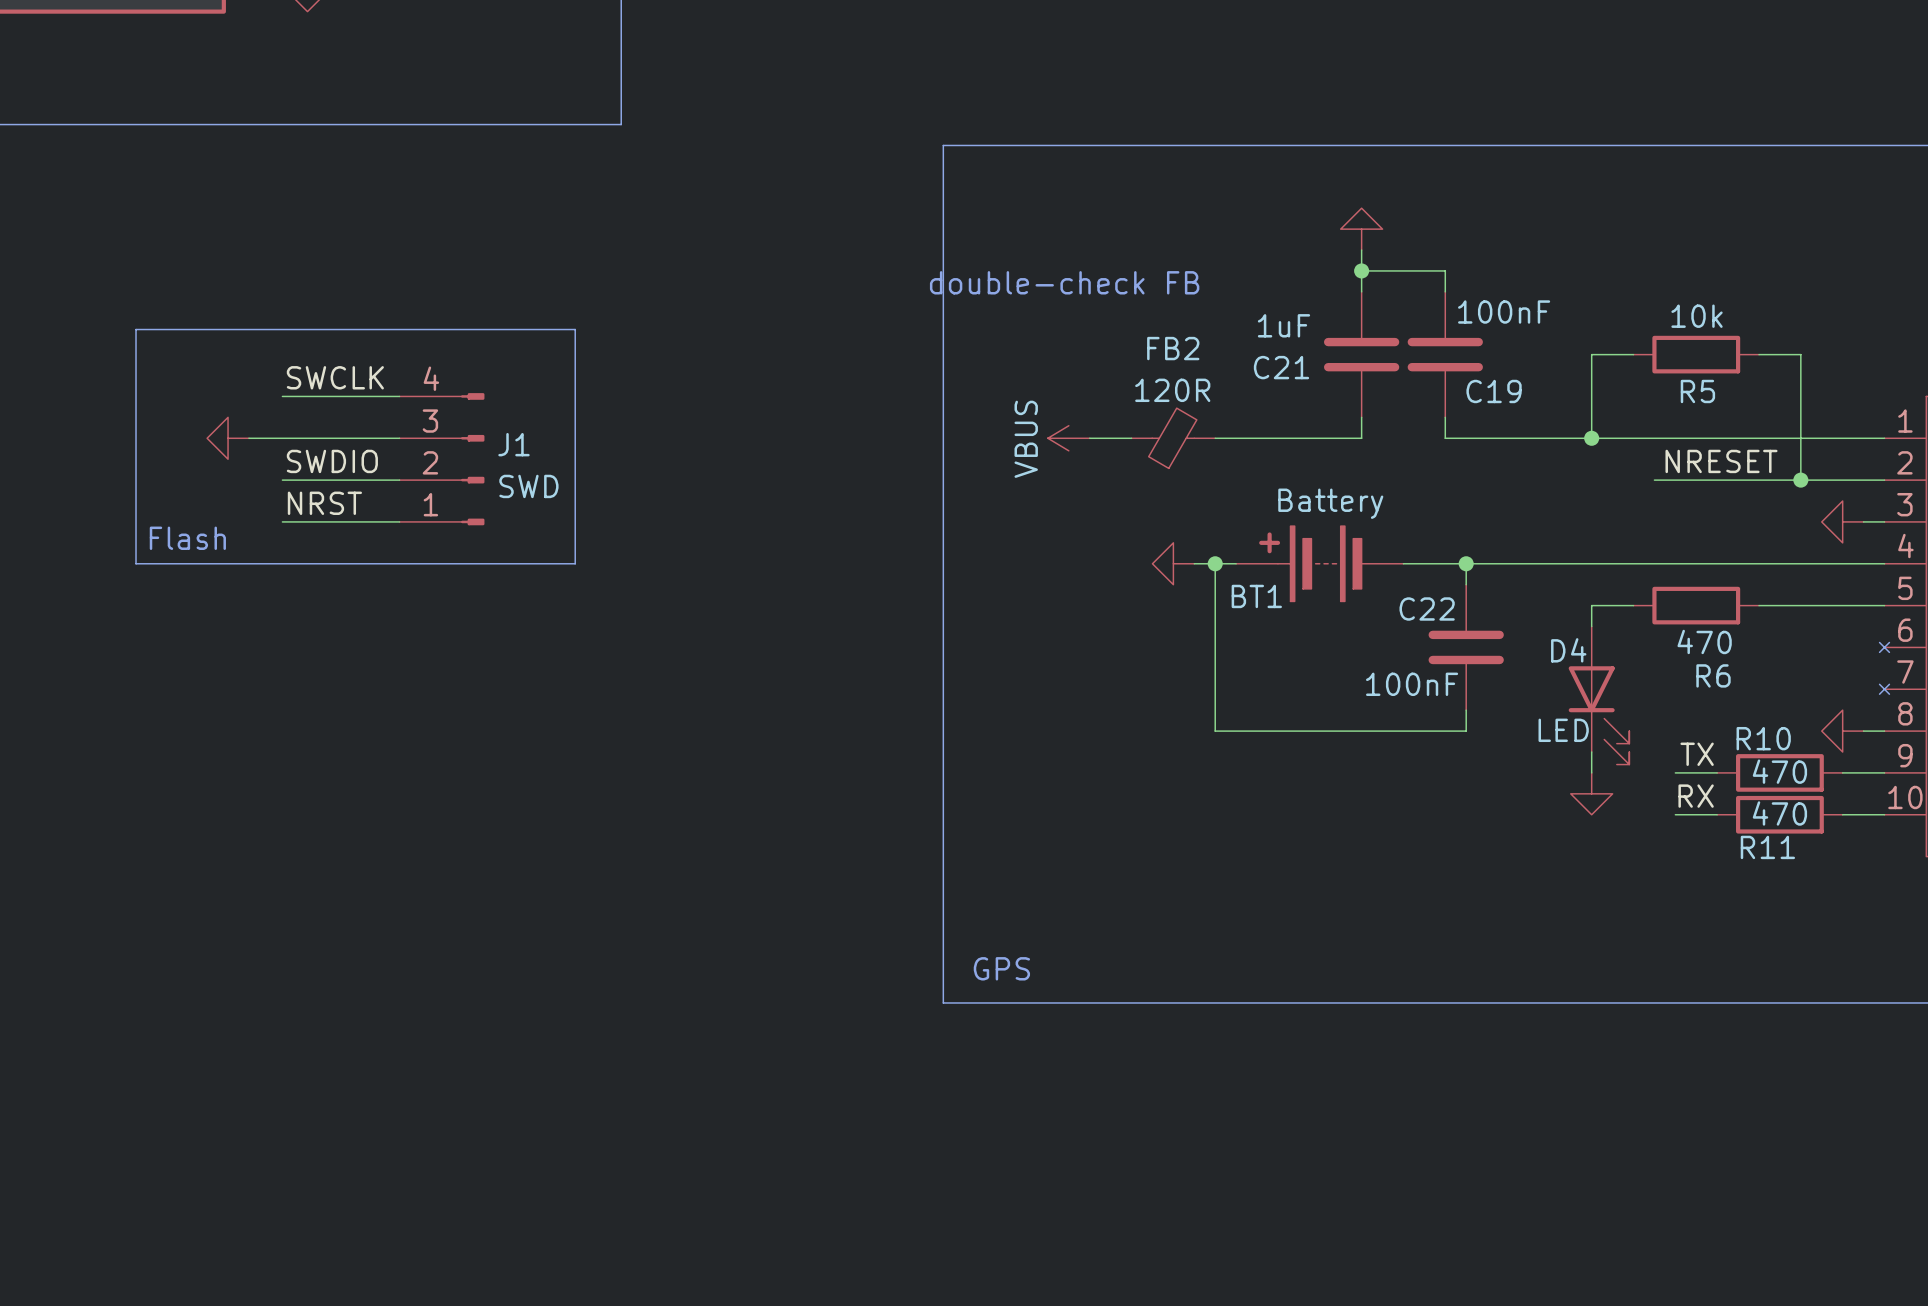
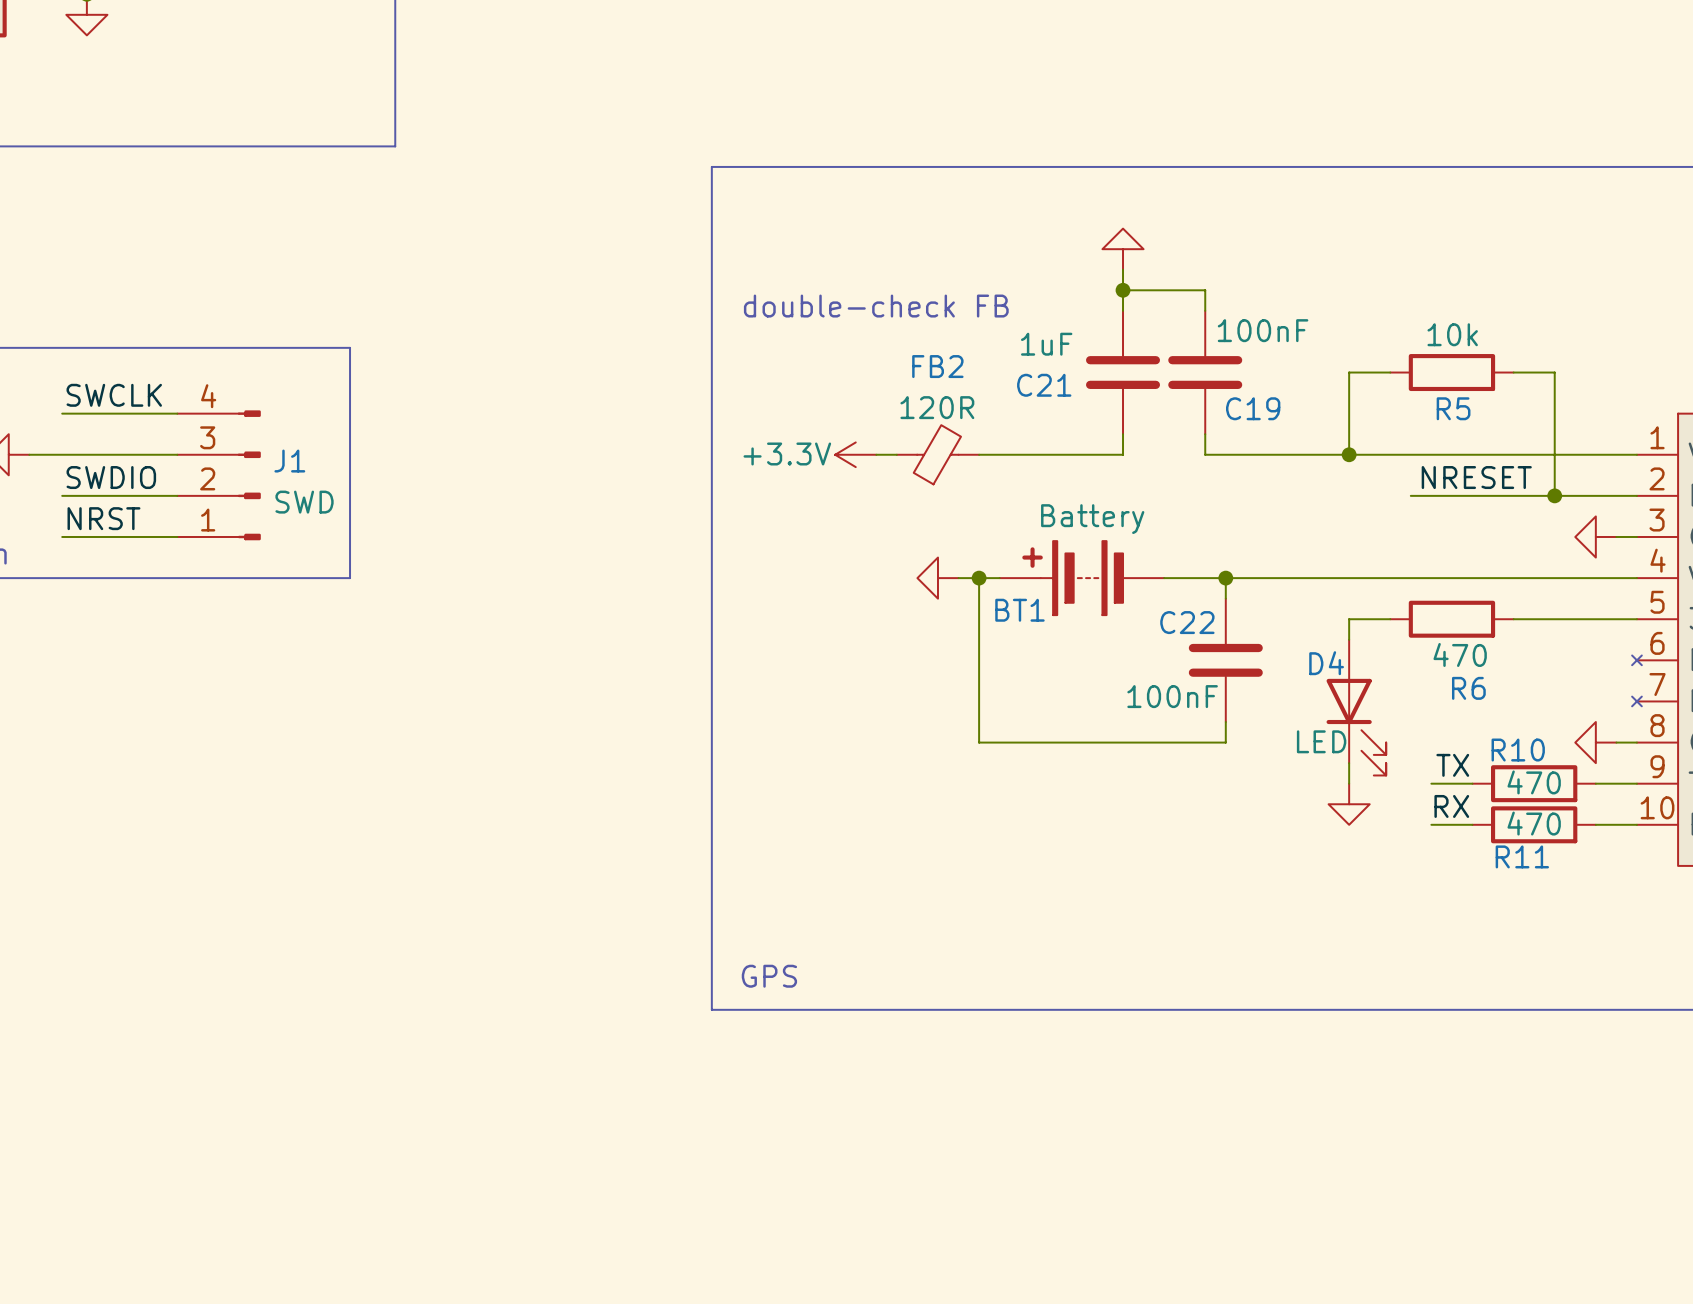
text position: double-check FB (1064, 282) -> double-check FB (876, 306)
power symbol: VBUS (1068, 438) -> none
power symbol: none -> +3.3V (855, 454)

